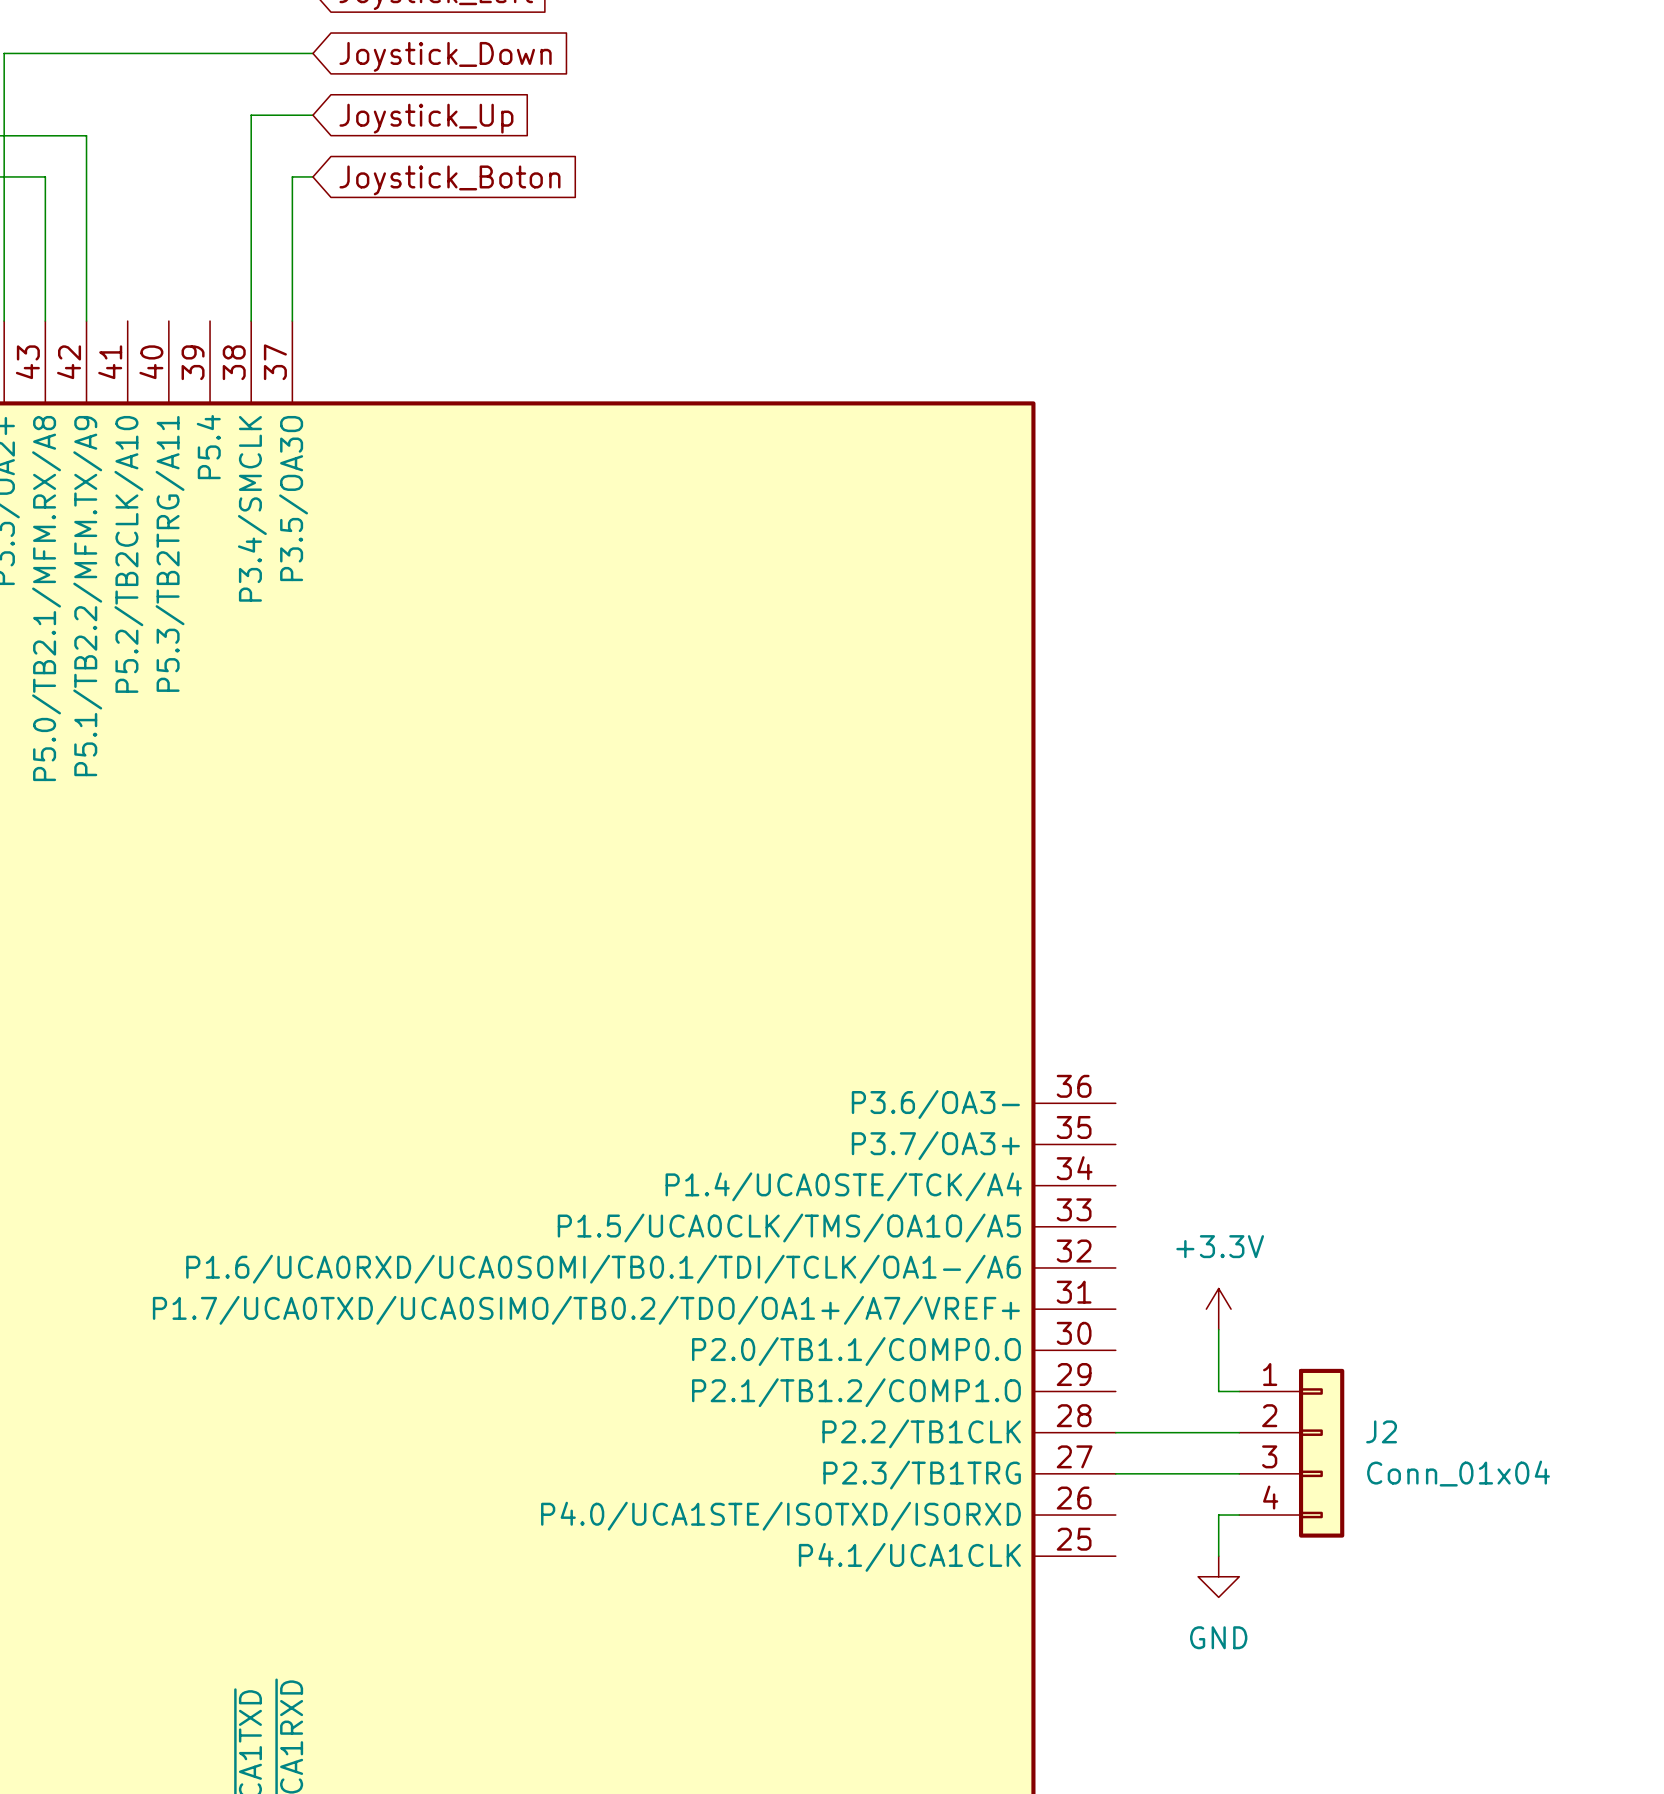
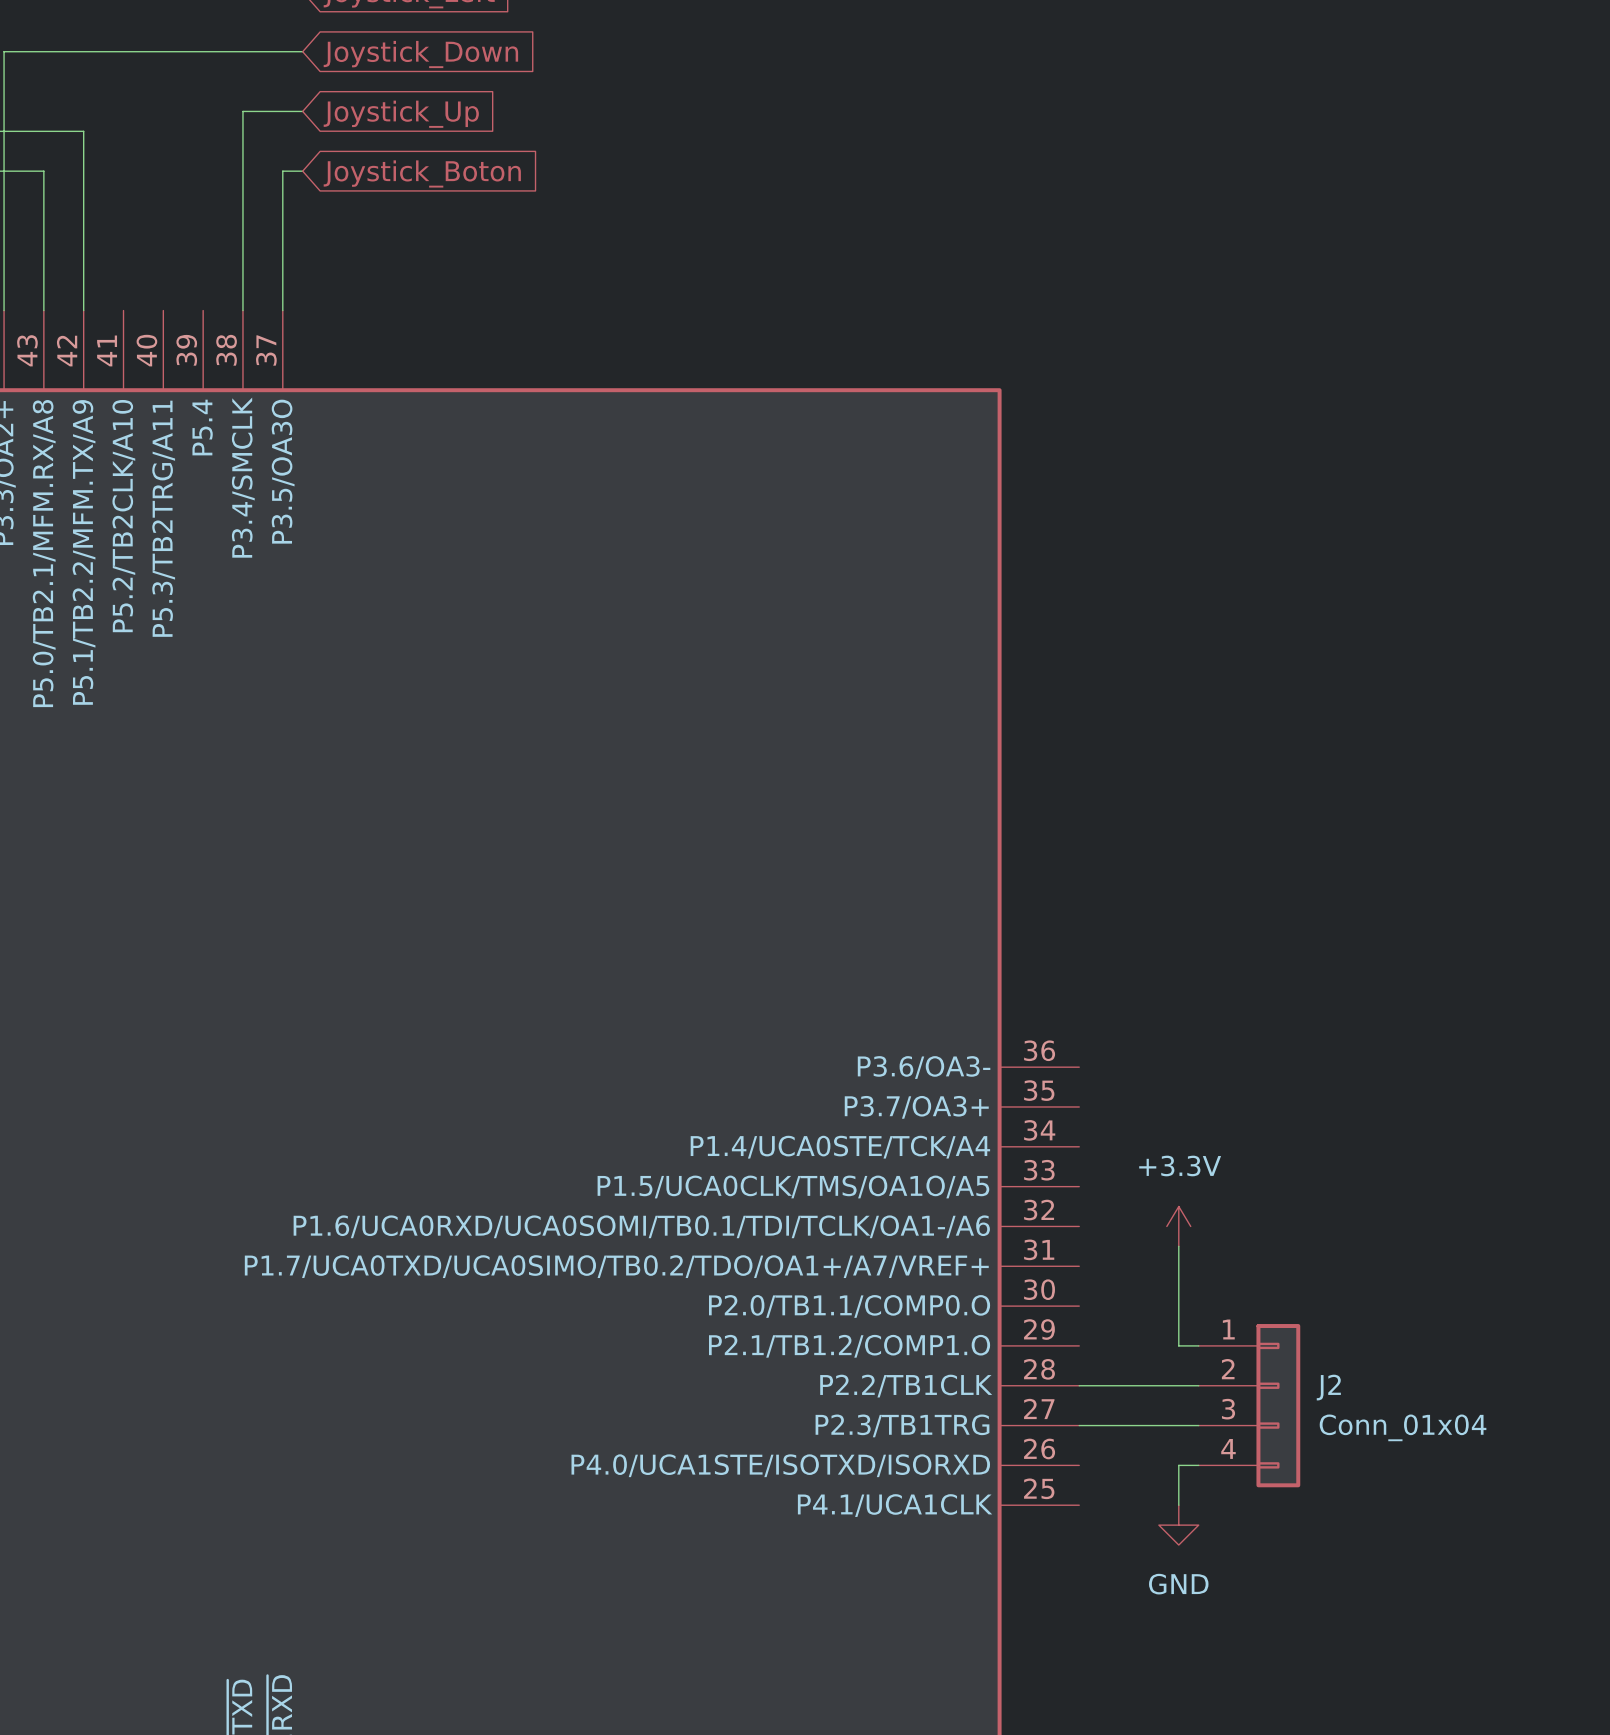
power symbol position: +3.3V (1218, 1309) -> +3.3V (1178, 1226)

